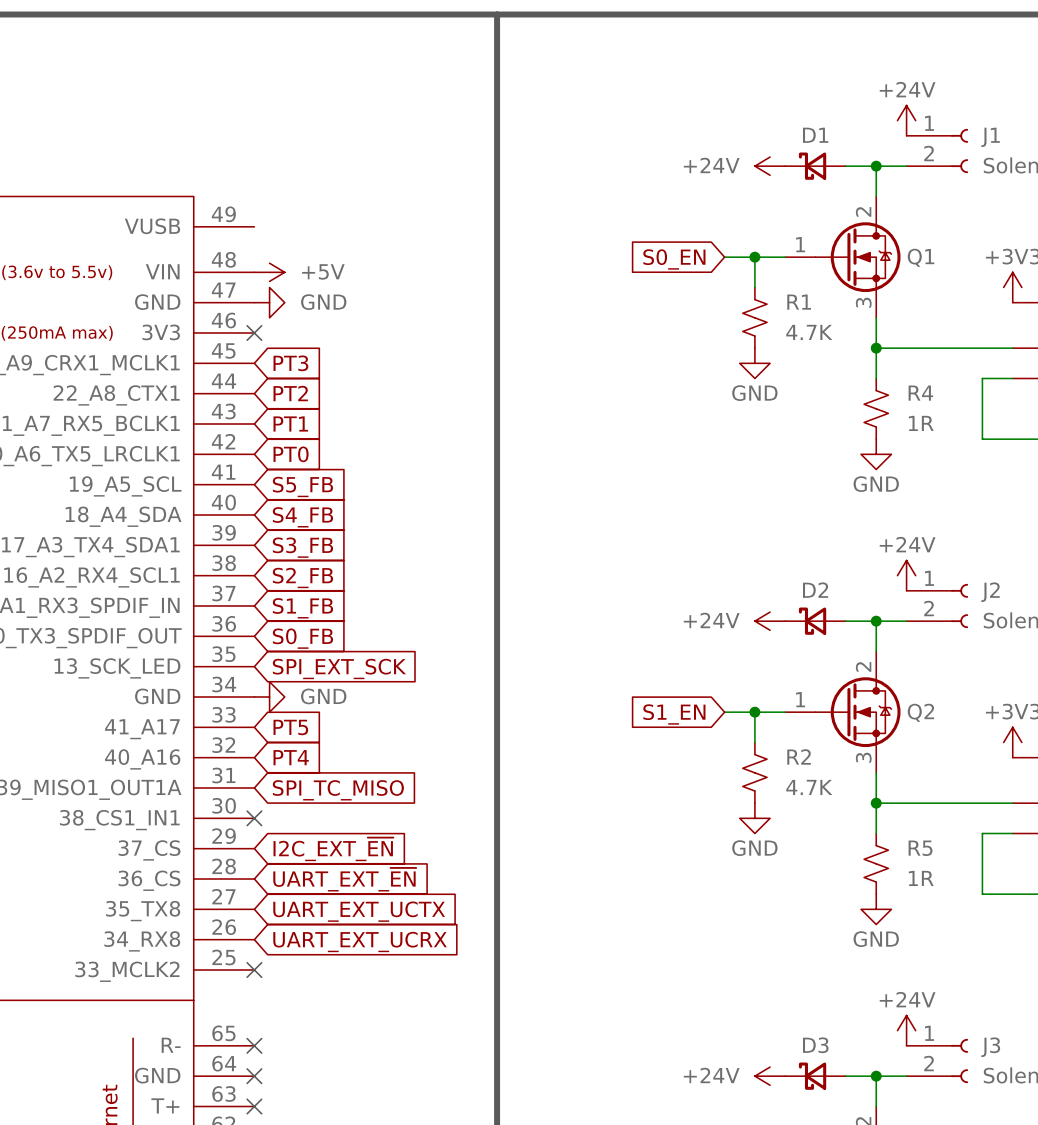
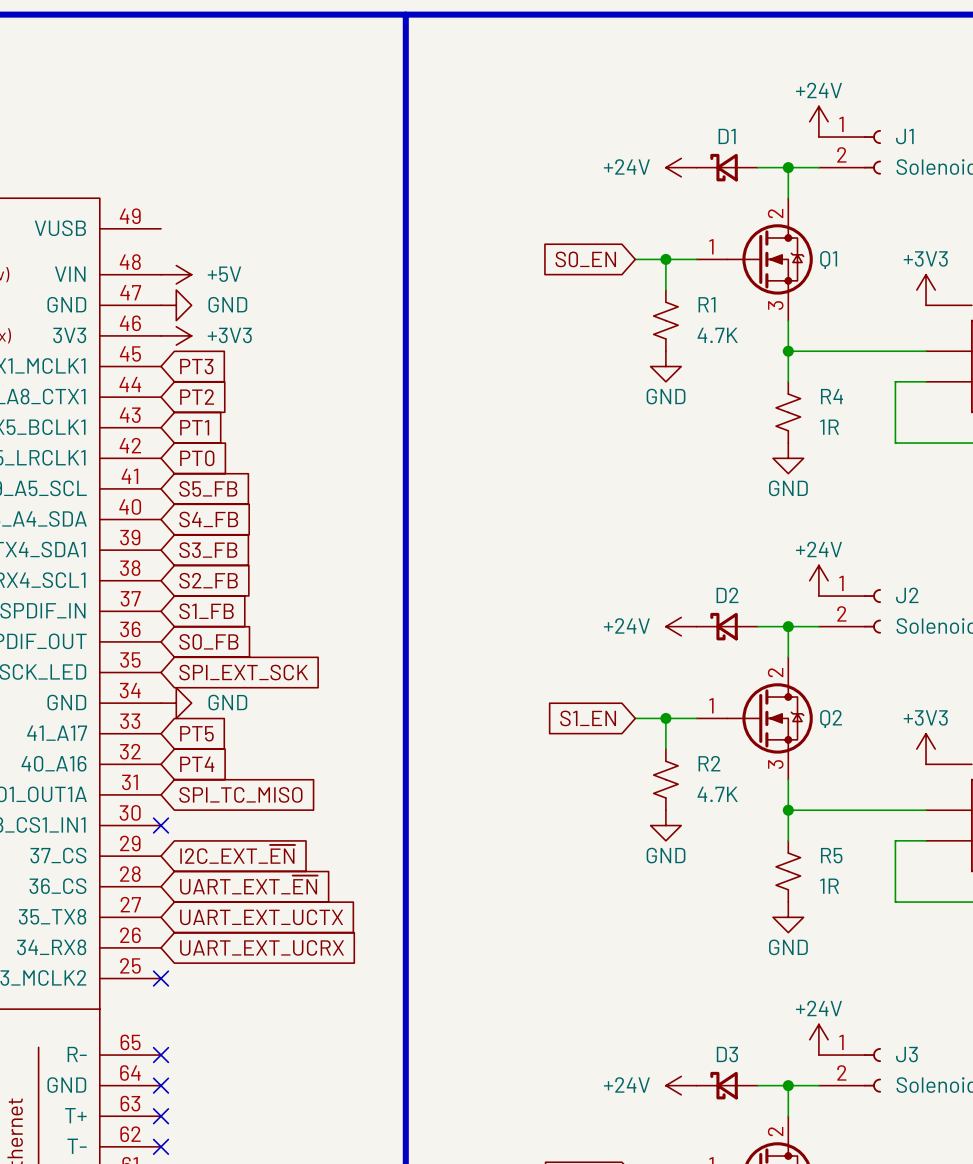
no-connect mark: (254, 332) -> none
power symbol: none -> +3V3 (176, 335)

